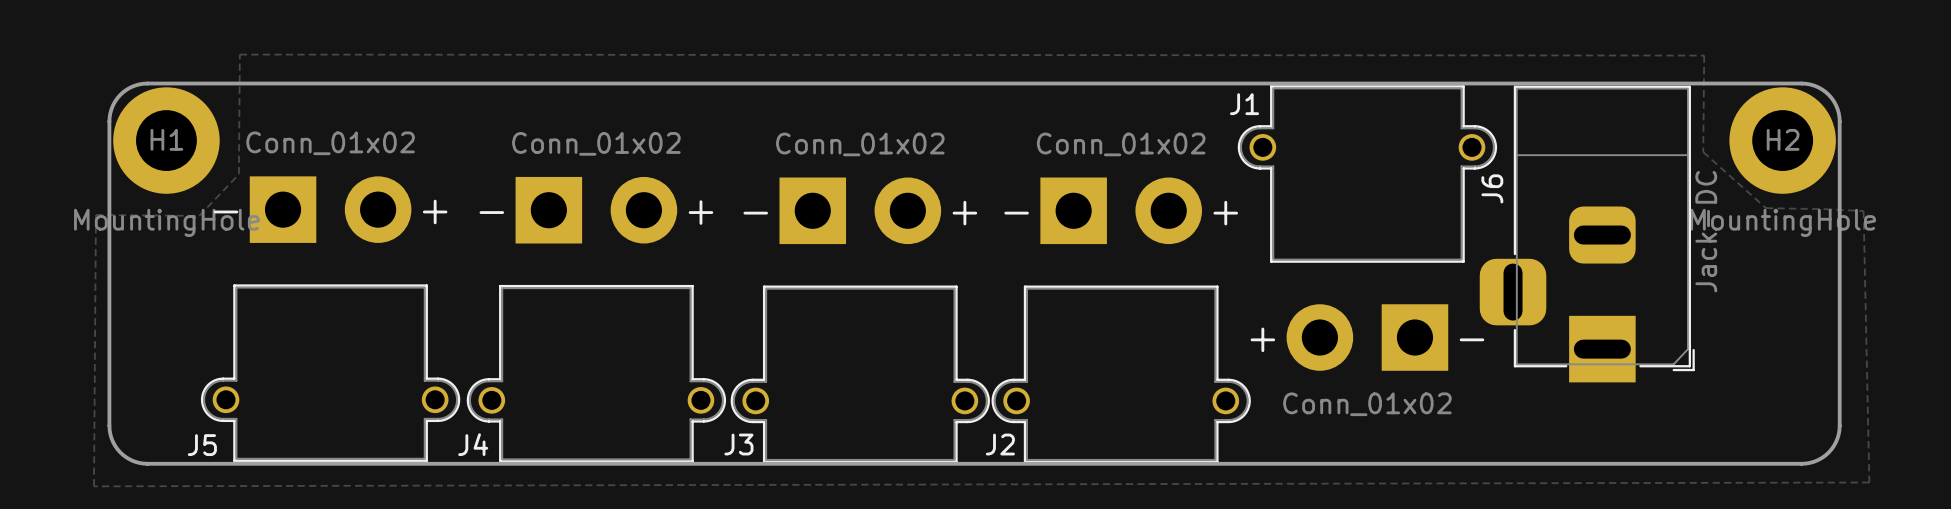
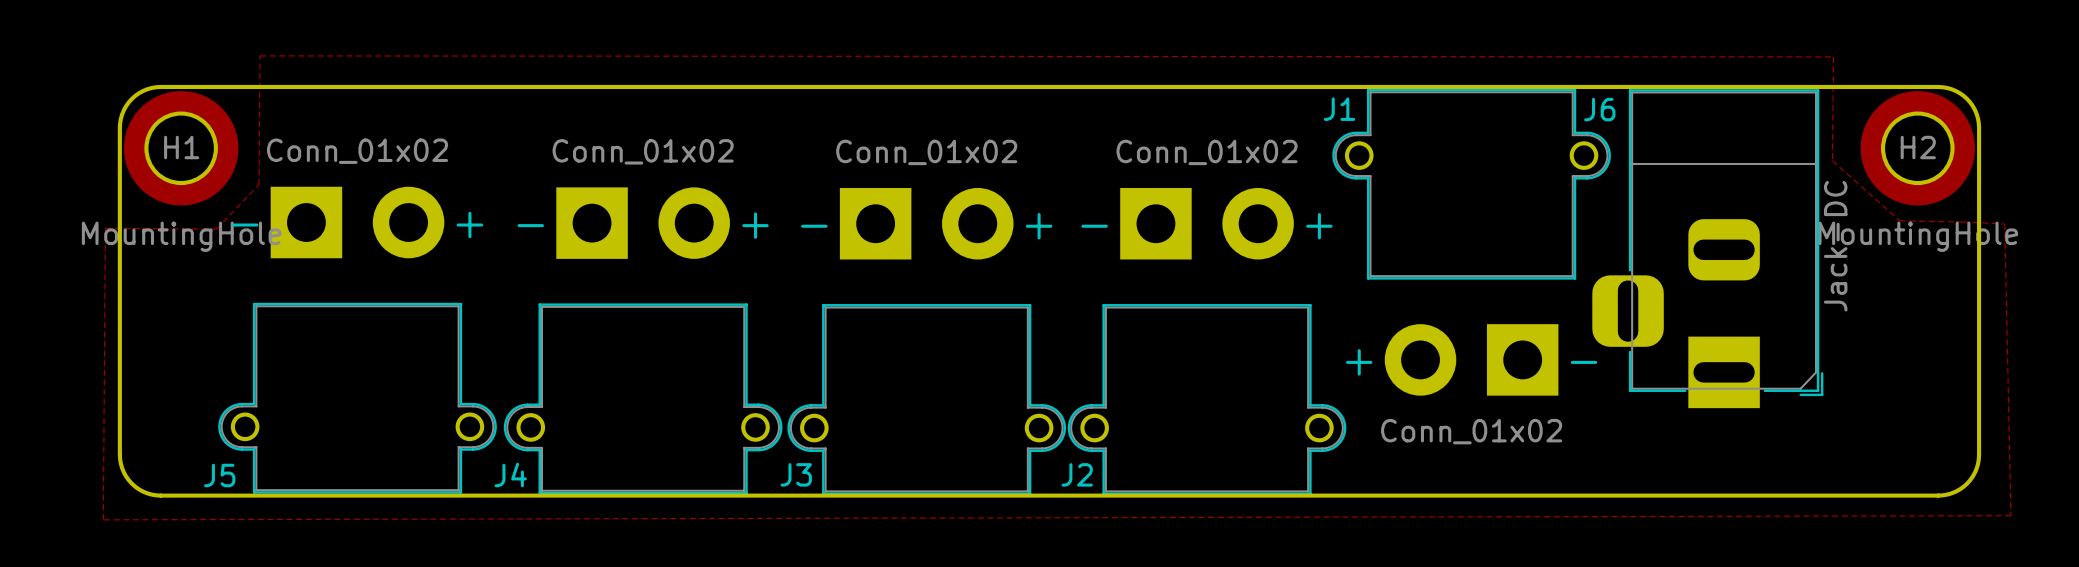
J6 name rotation: 0° (1492, 188) -> 90° clockwise (1599, 109)
J6 name position: J6 (1492, 188) -> J6 (1599, 109)

